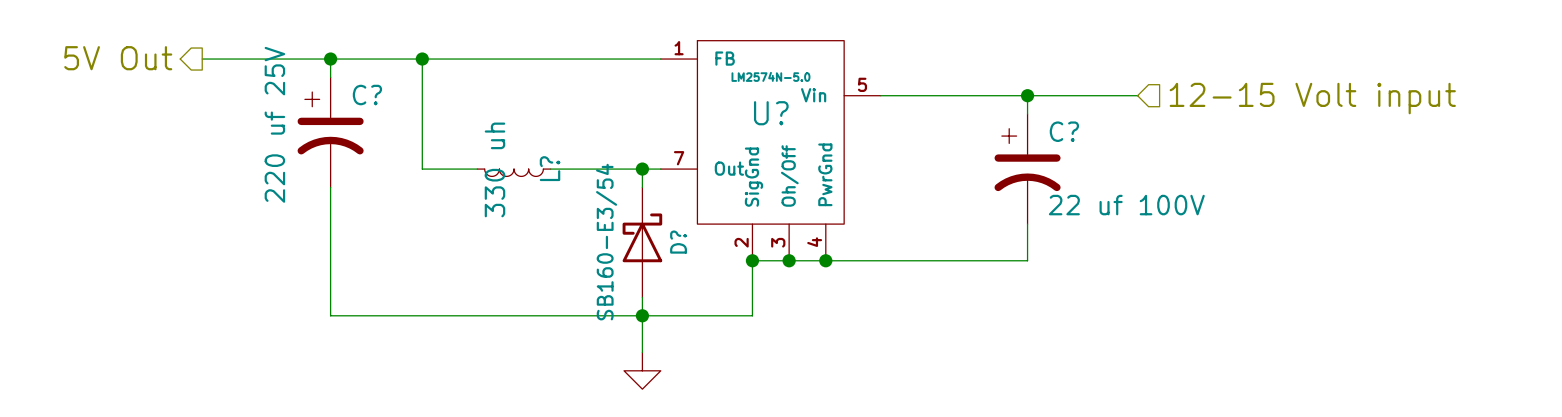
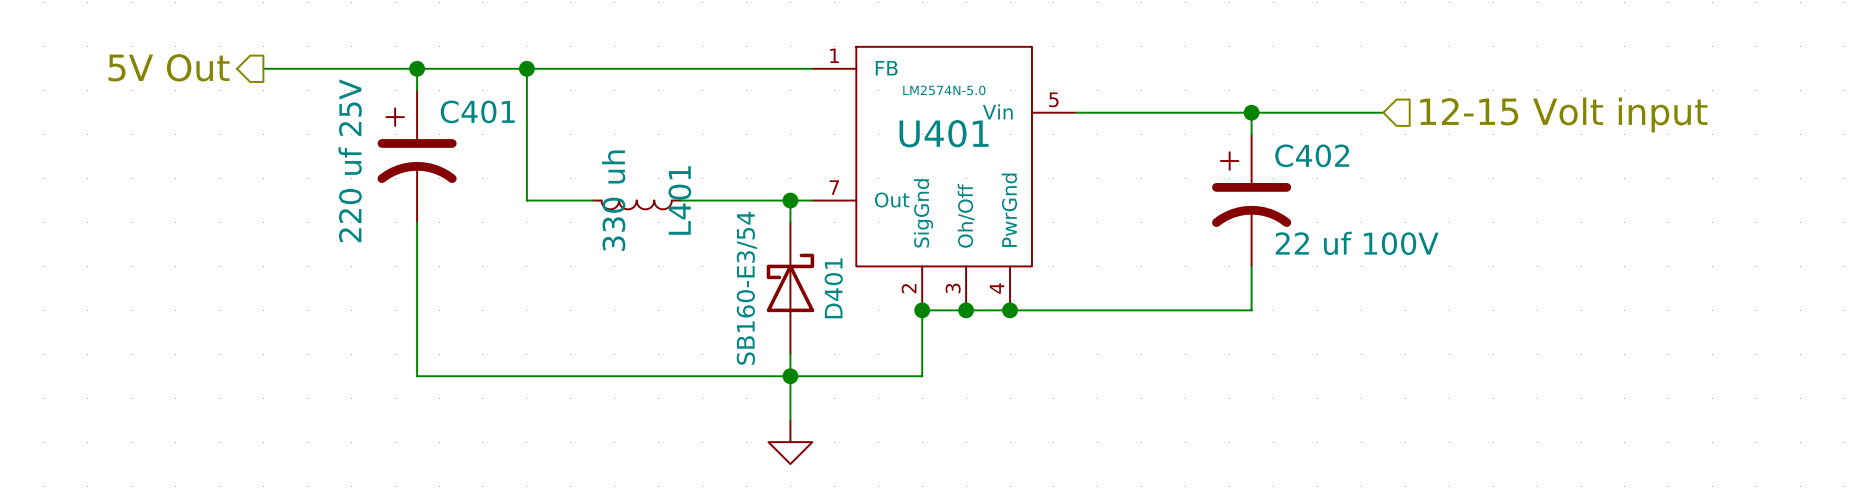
C? name: C? (367, 95) -> C401 (477, 111)
U? name: U? (771, 113) -> U401 (944, 133)
C? name: C? (1064, 131) -> C402 (1312, 155)
L? name: L? (550, 168) -> L401 (679, 200)
D? name: D? (678, 242) -> D401 (833, 288)

